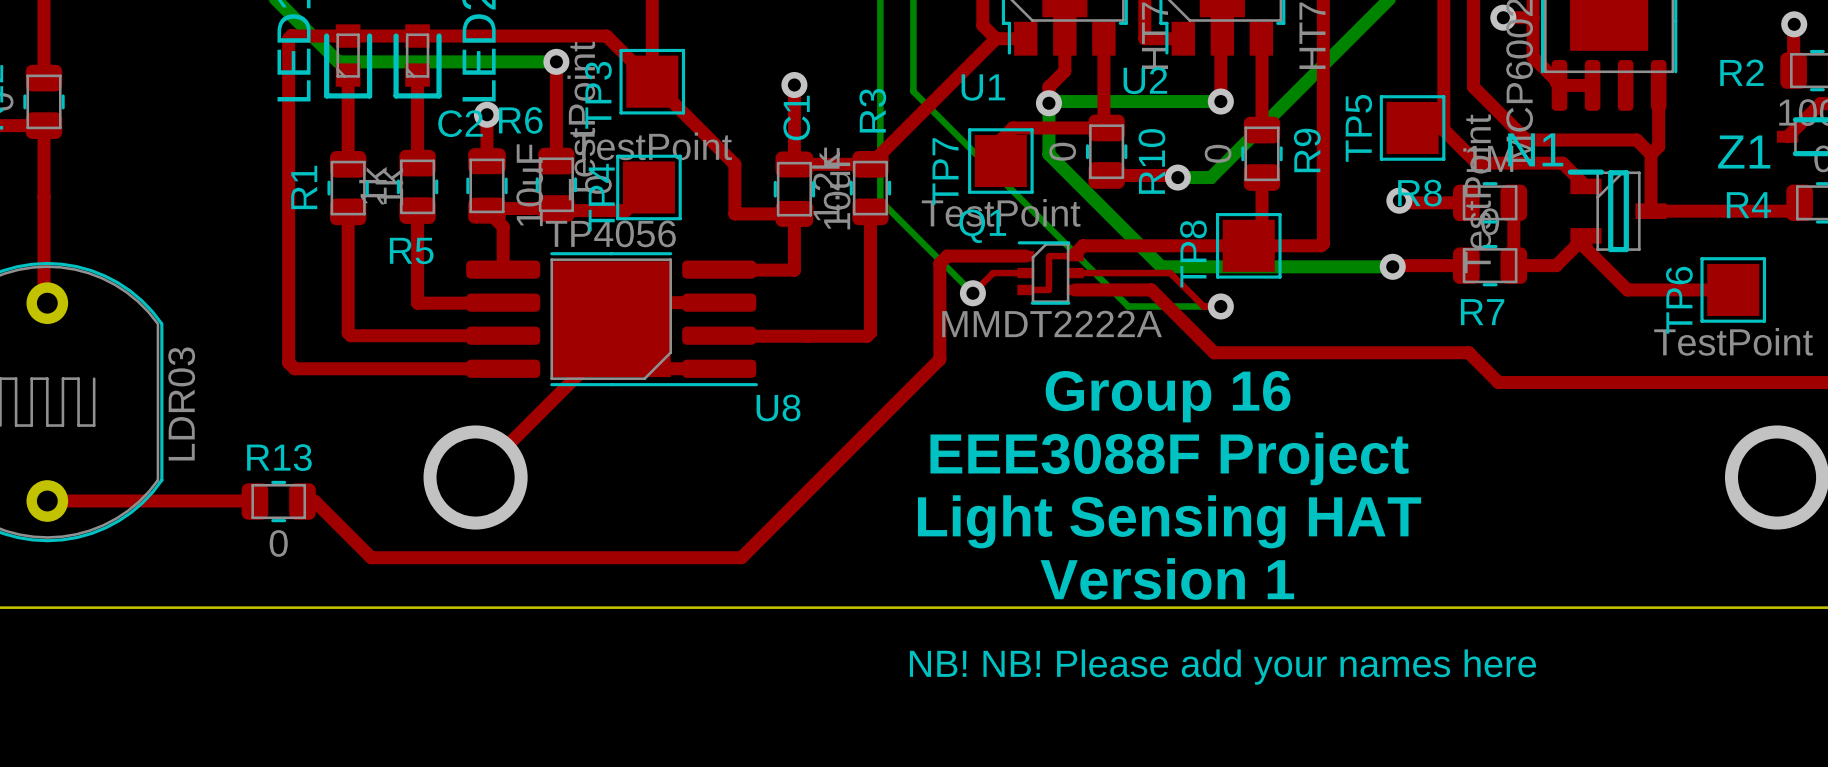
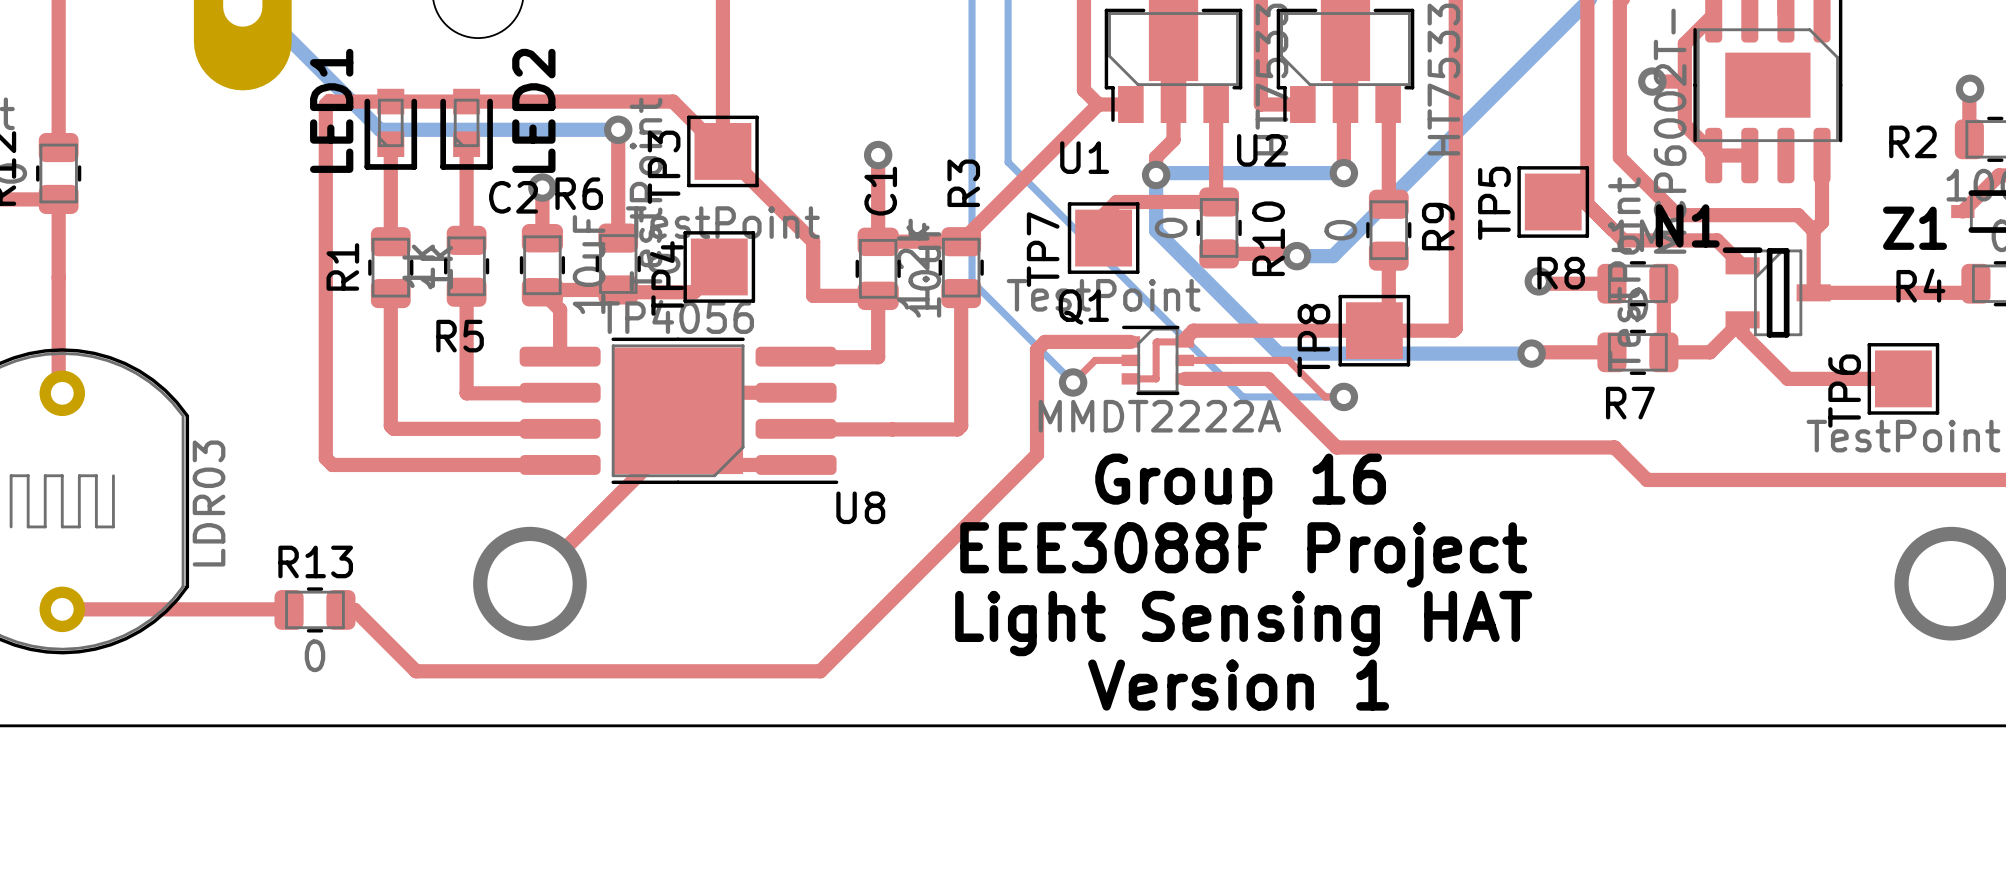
text position: Group 16 (1168, 396) -> Group 16 (1240, 486)
text position: EEE3088F Project (1169, 458) -> EEE3088F Project (1243, 554)
text position: Light Sensing HAT (1169, 521) -> Light Sensing HAT (1243, 623)
text position: Version 1 (1167, 578) -> Version 1 (1238, 685)
text: NB! NB! Please add your names here (1222, 667) -> none

